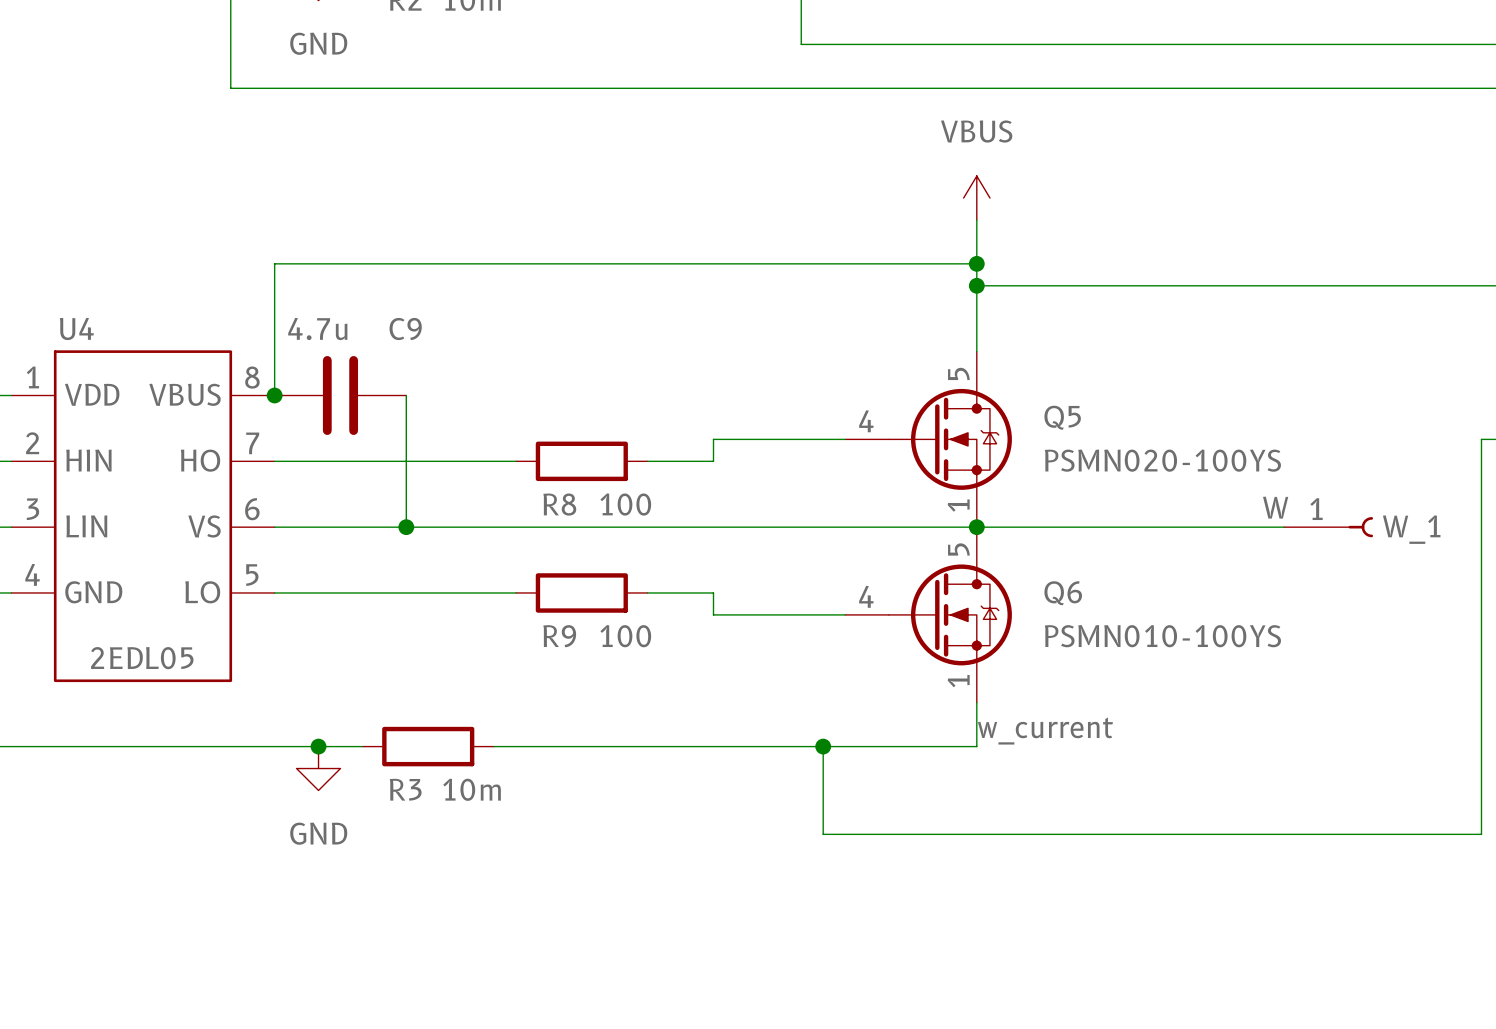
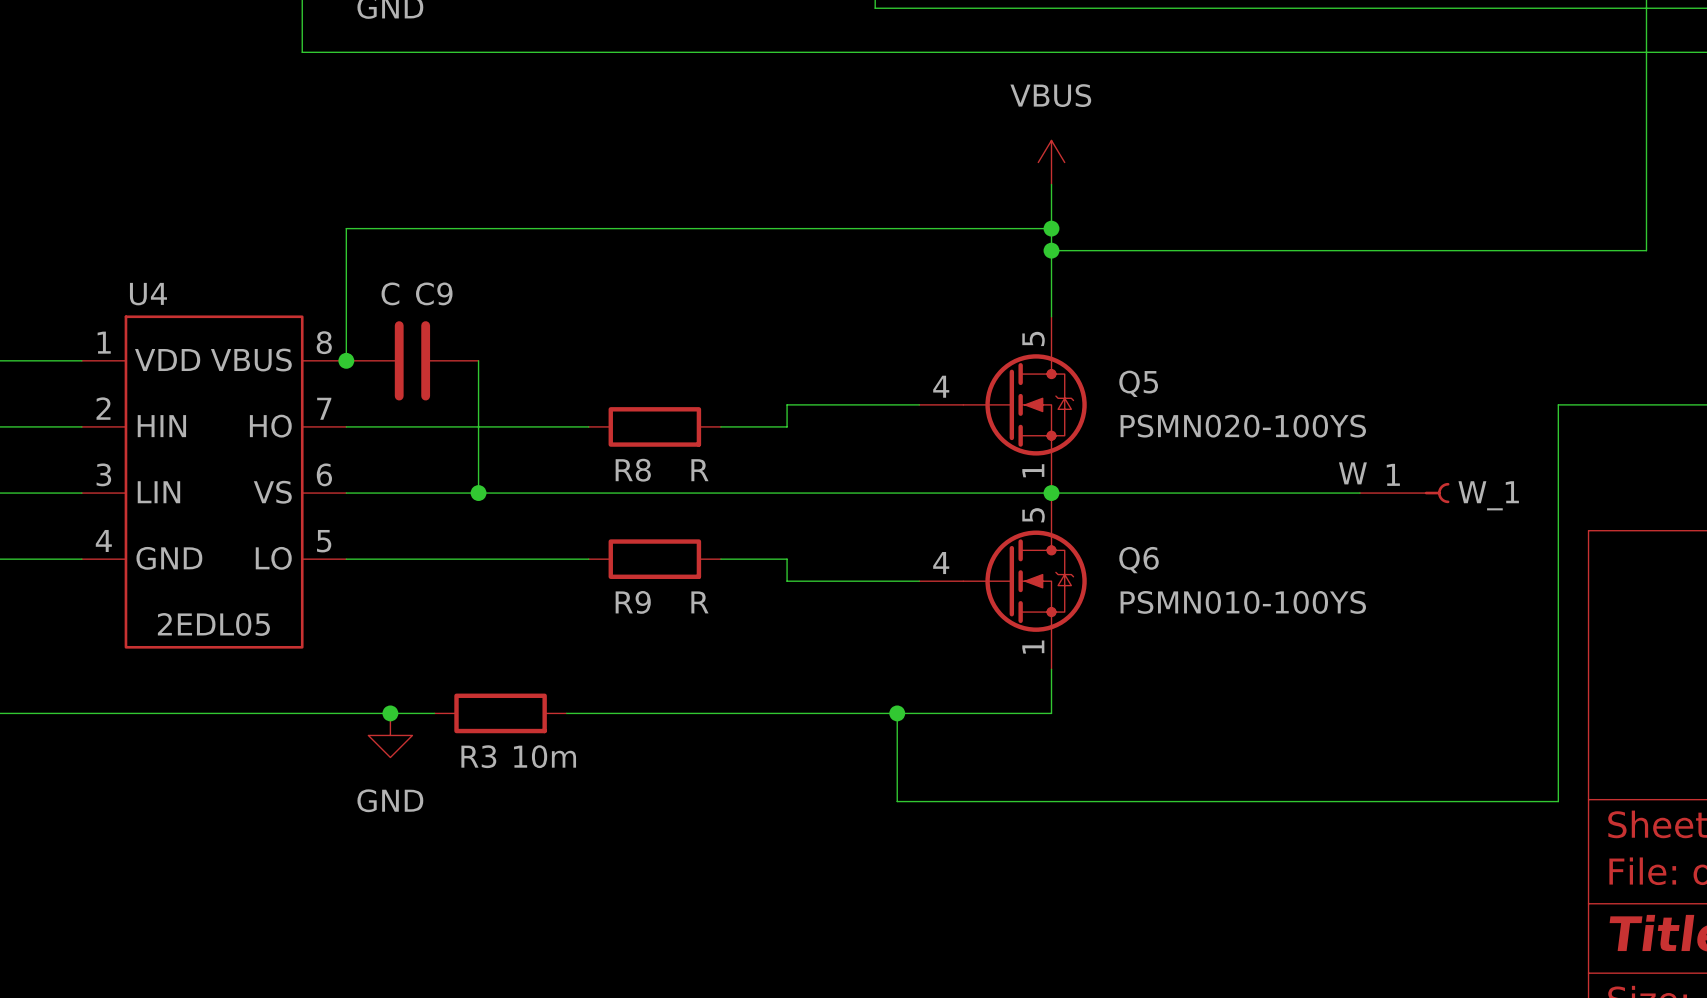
C9 value: 4.7u (317, 328) -> C (390, 293)
C9 name position: C9 (405, 329) -> C9 (434, 293)
R8 value: 100 (625, 504) -> R (699, 470)
R9 value: 100 (625, 636) -> R (699, 602)
label: w_current (1045, 731) -> none

